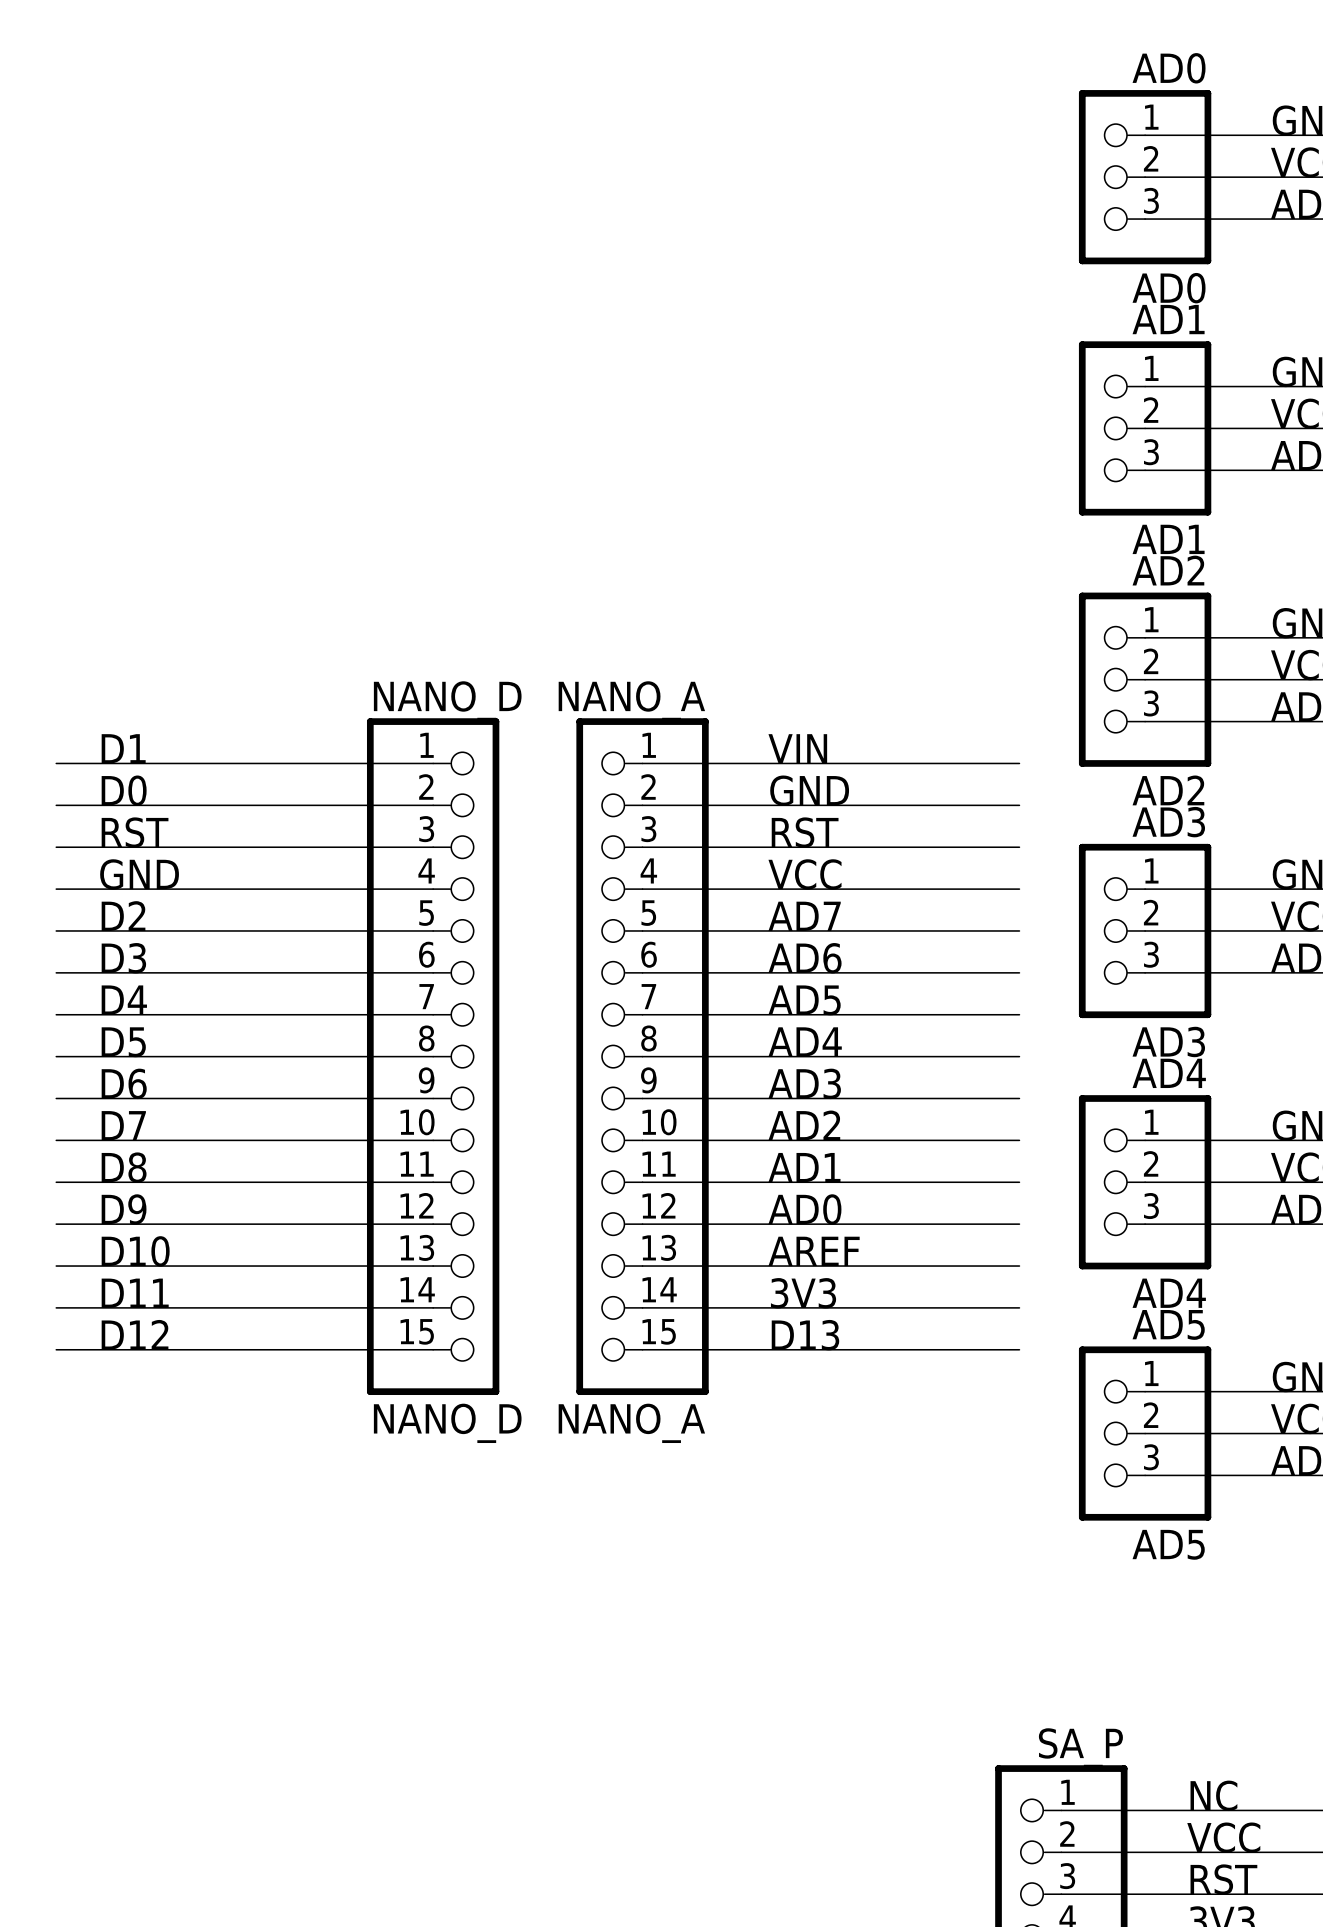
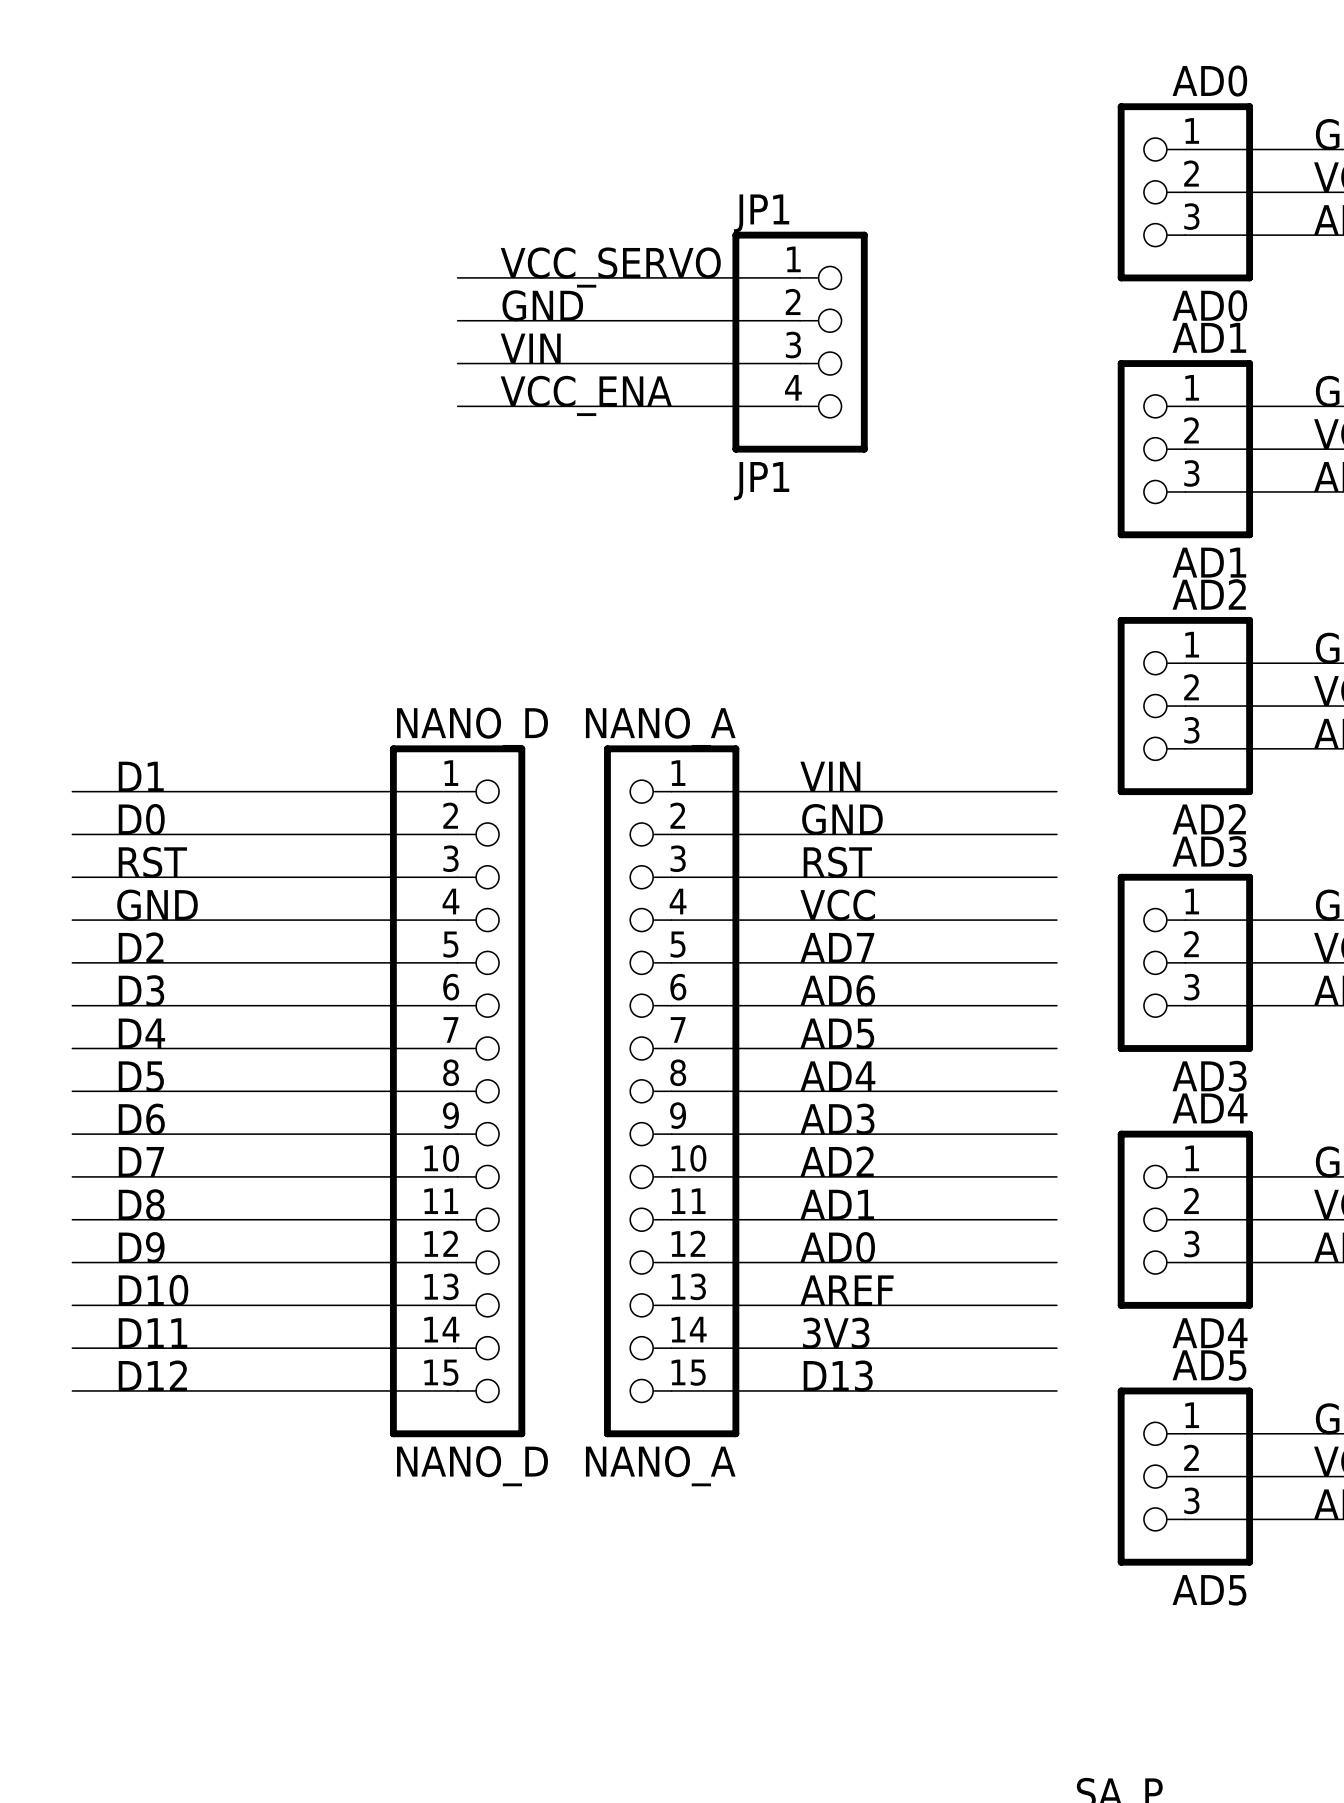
label: none -> VCC_SERVO (610, 267)
wire: none -> (457, 277) (800, 277)
label: none -> GND (542, 305)
wire: none -> (457, 320) (800, 320)
JP1: none -> JP1 (800, 342)
label: none -> VIN (530, 348)
wire: none -> (457, 363) (800, 363)
label: none -> VCC_ENA (586, 395)
wire: none -> (457, 406) (800, 406)

